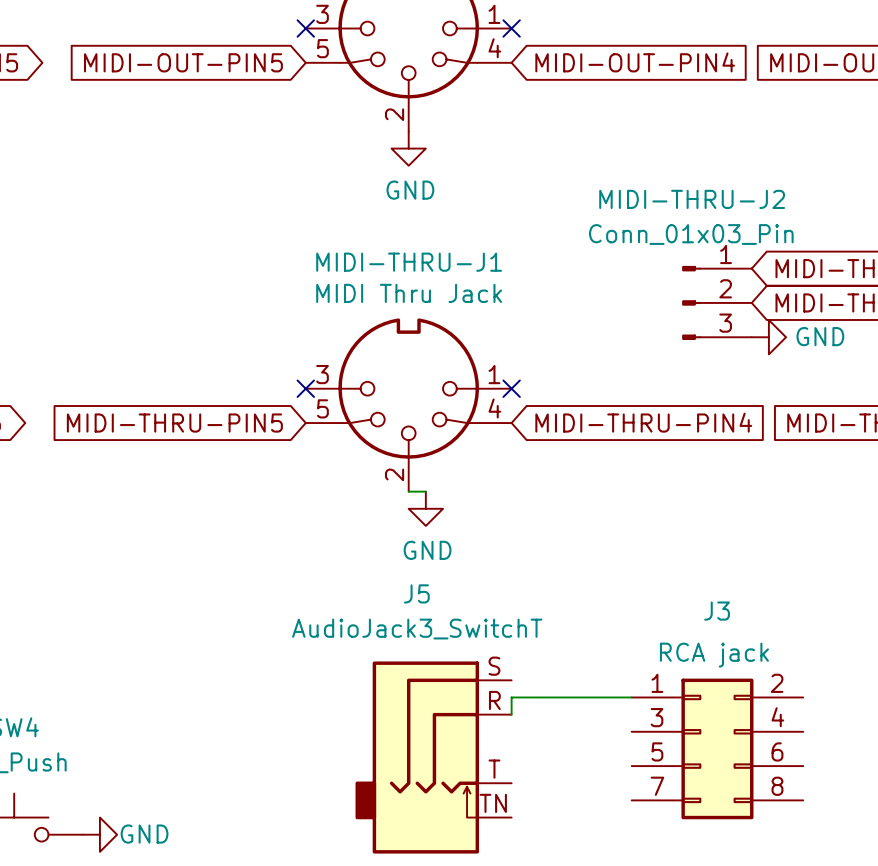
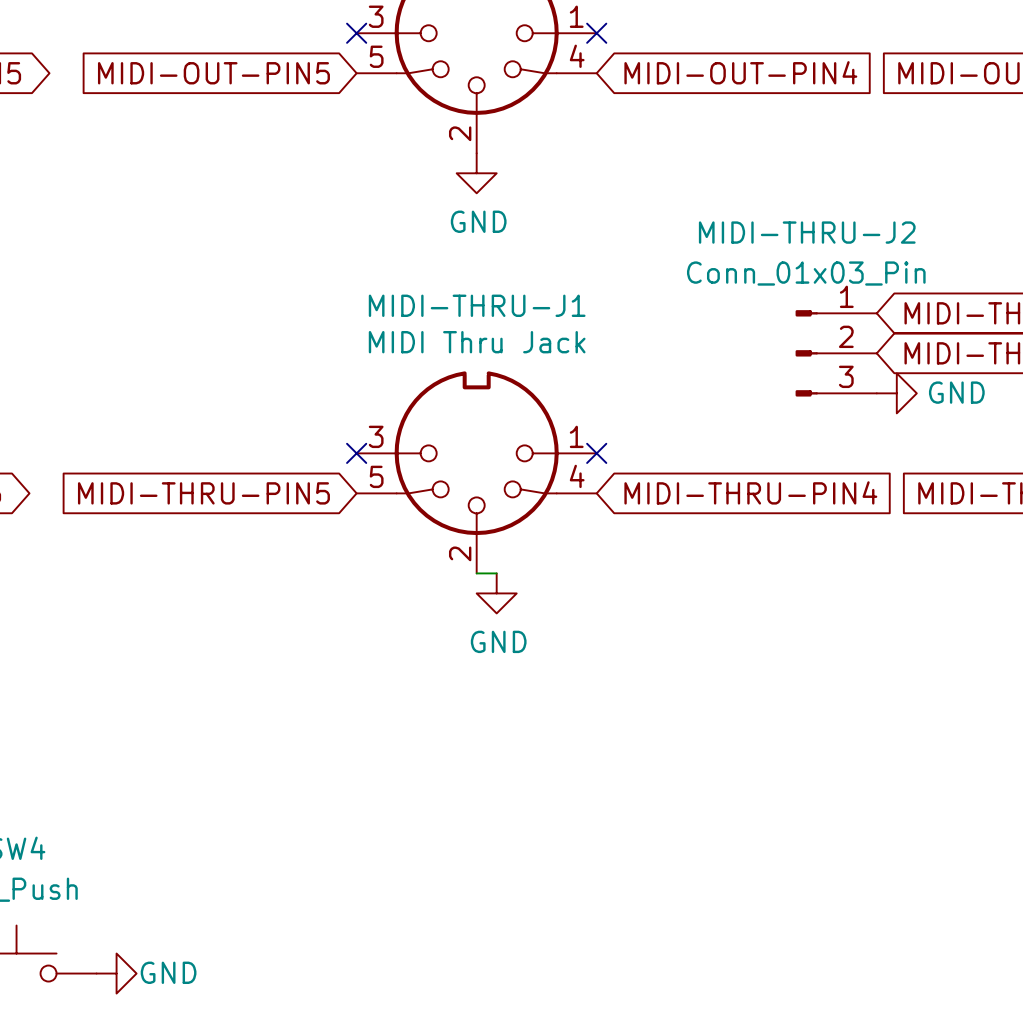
wire: (631, 697) (511, 697) (511, 714) -> none
J3: (717, 748) -> none
J5: AudioJack3_SwitchT (433, 757) -> none

